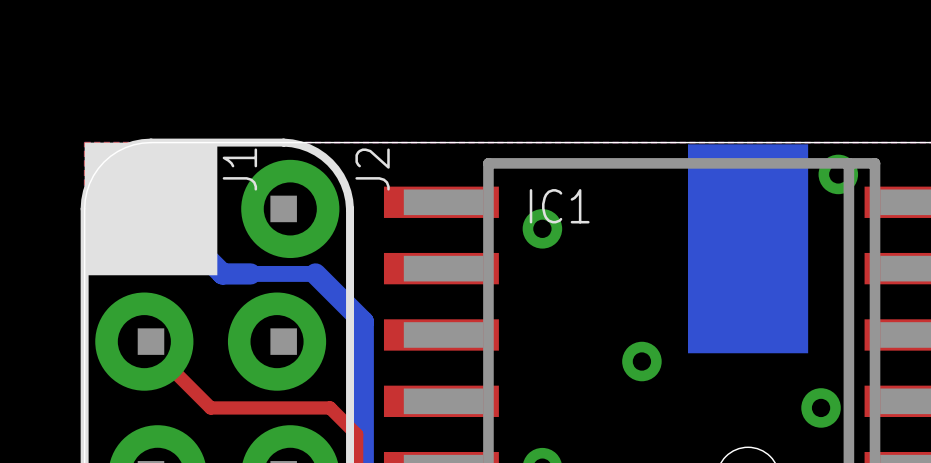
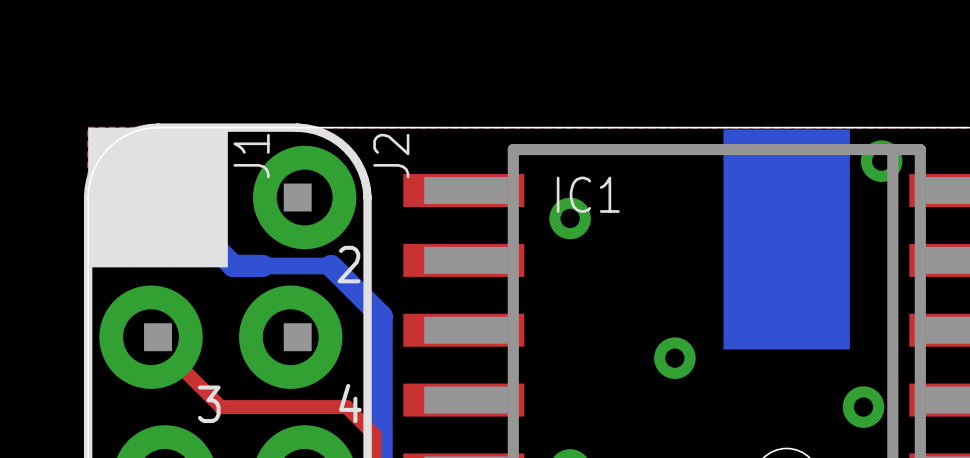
text: none -> 2 (348, 264)
text: none -> 4 (350, 403)
text: none -> 3 (209, 404)

